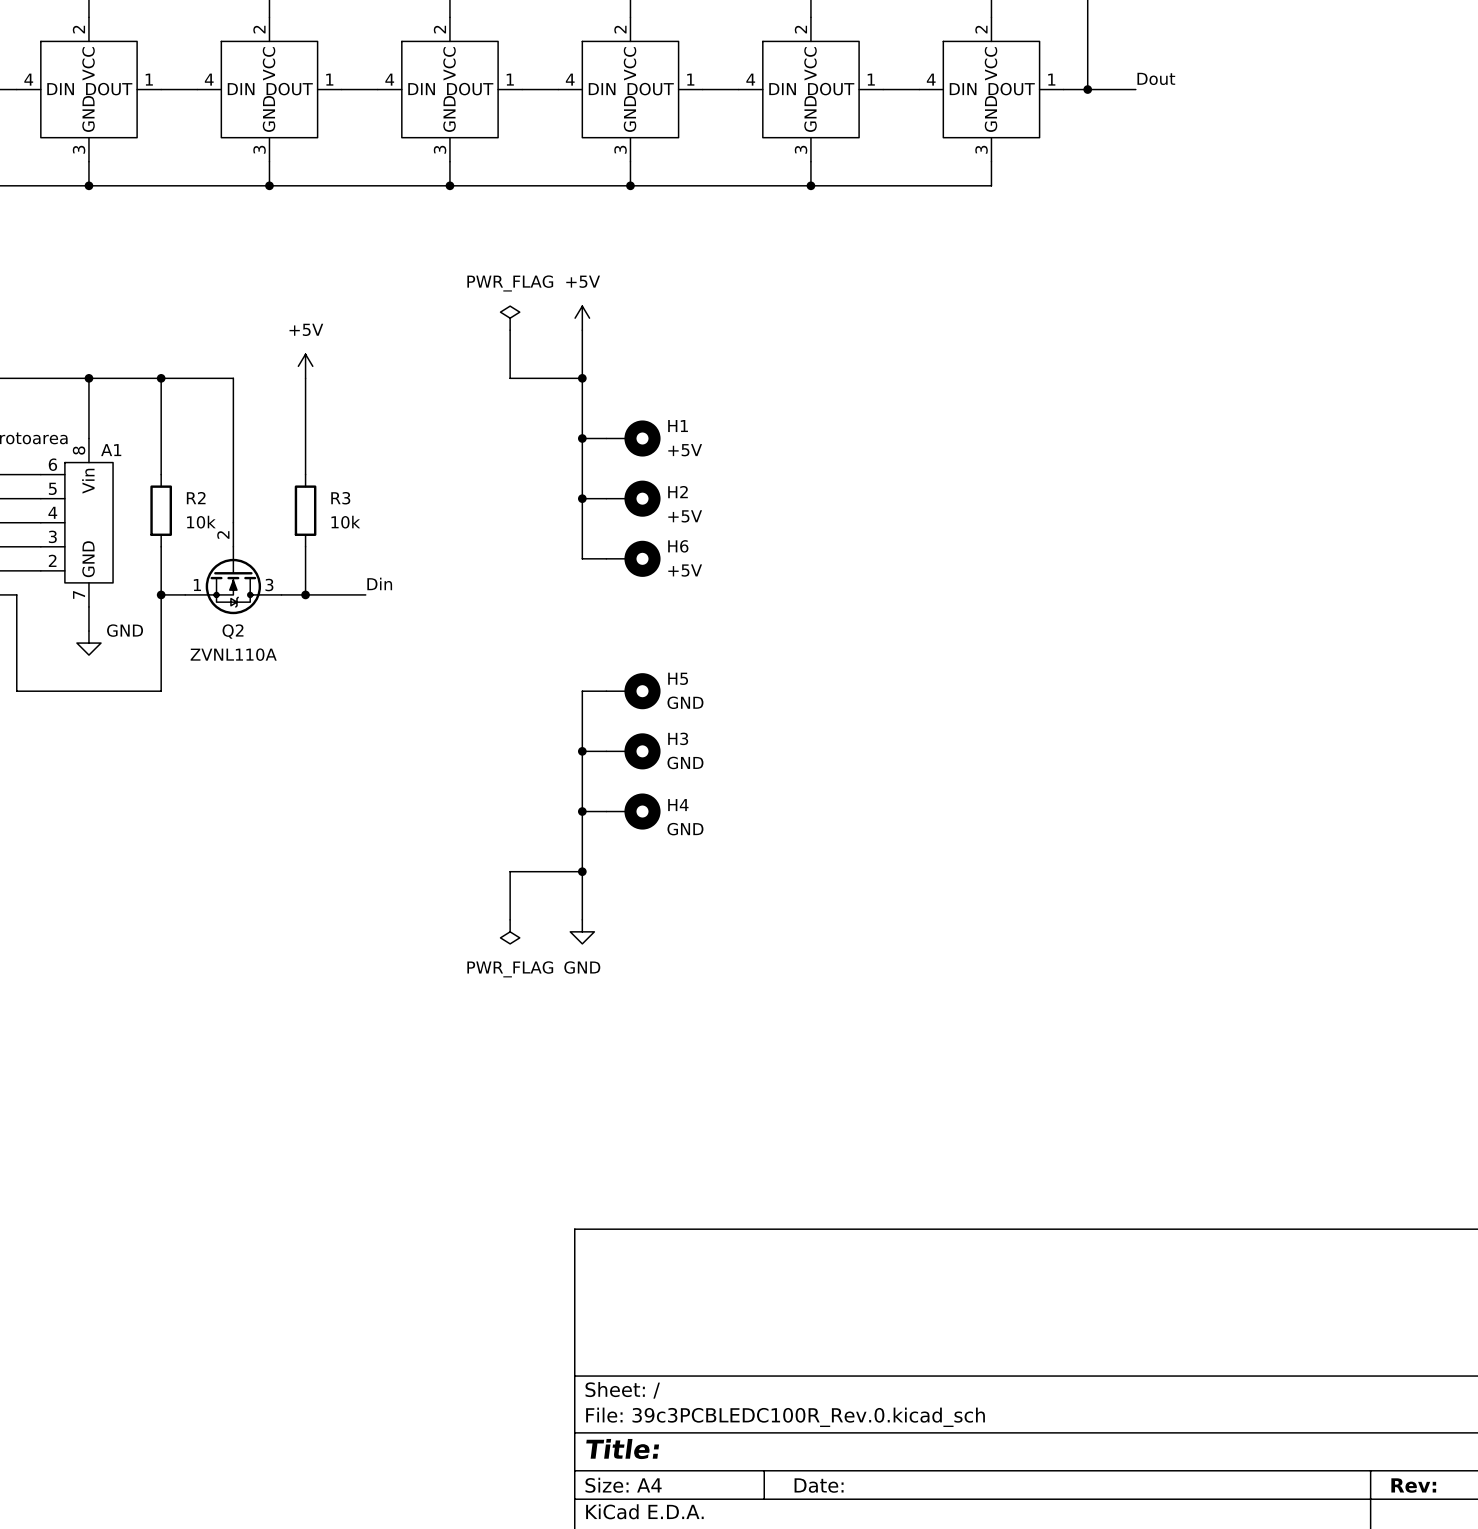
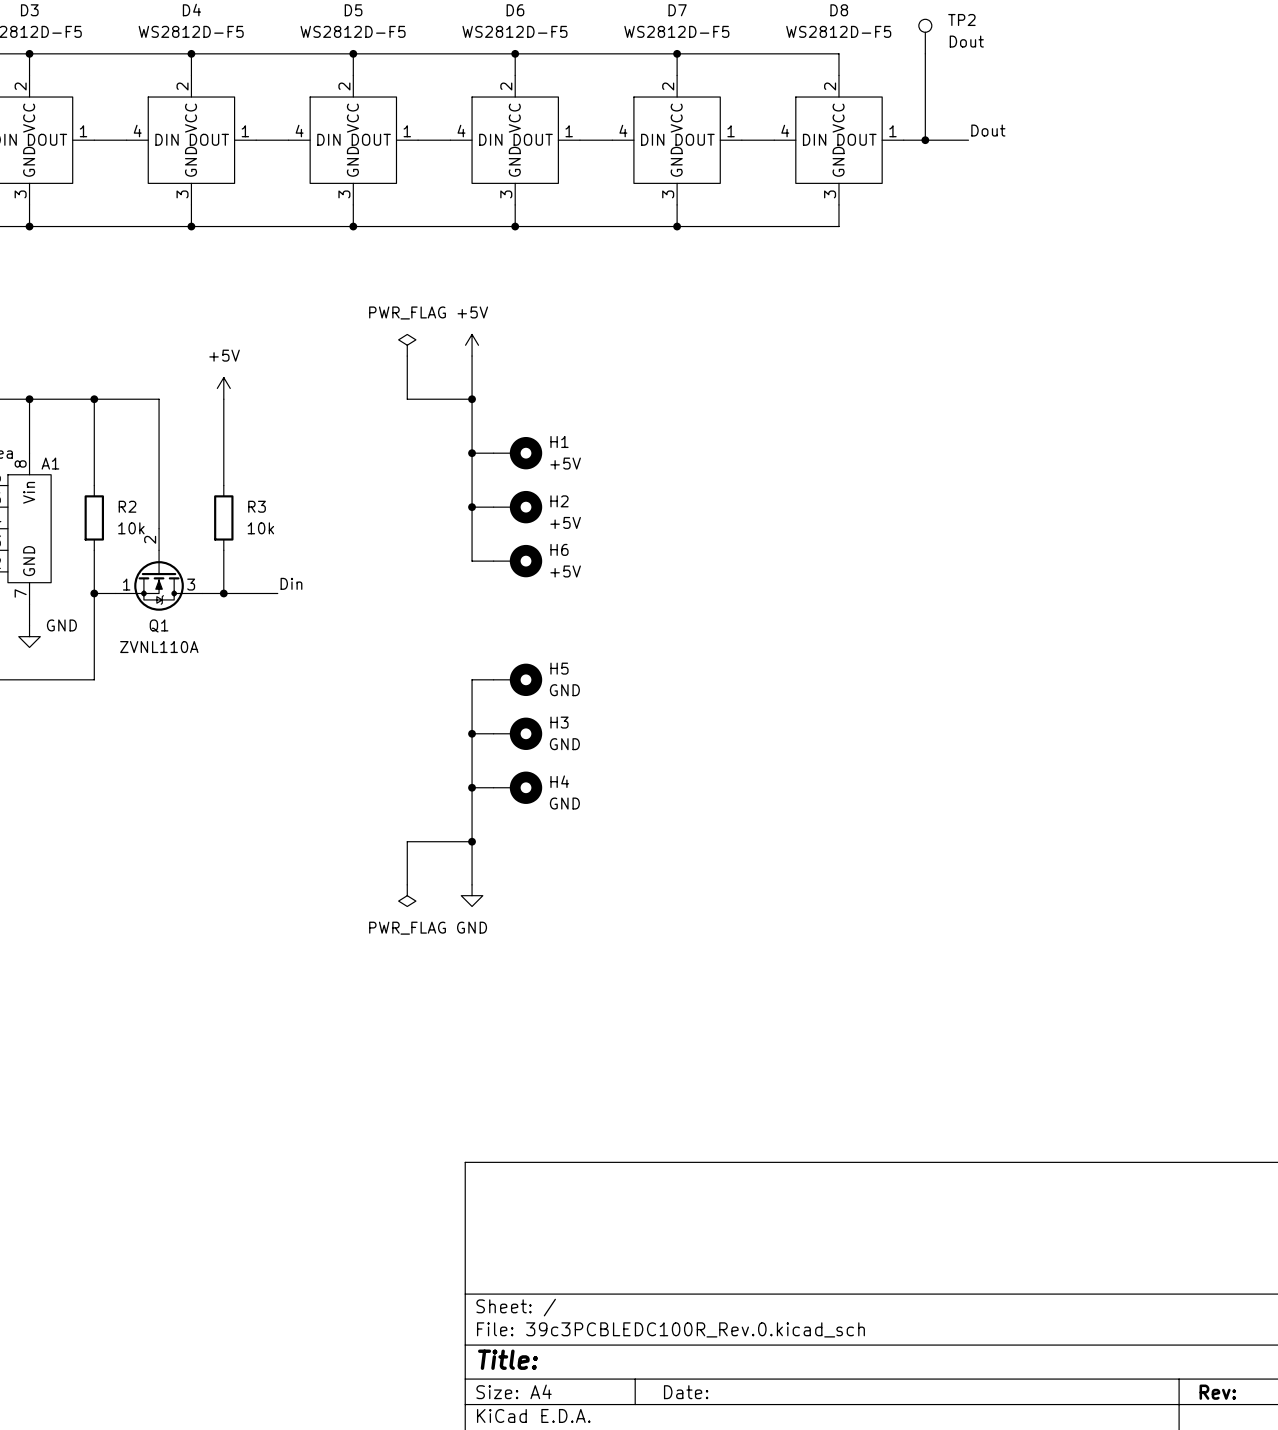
Q2 name: Q2 (233, 631) -> Q1 (159, 625)

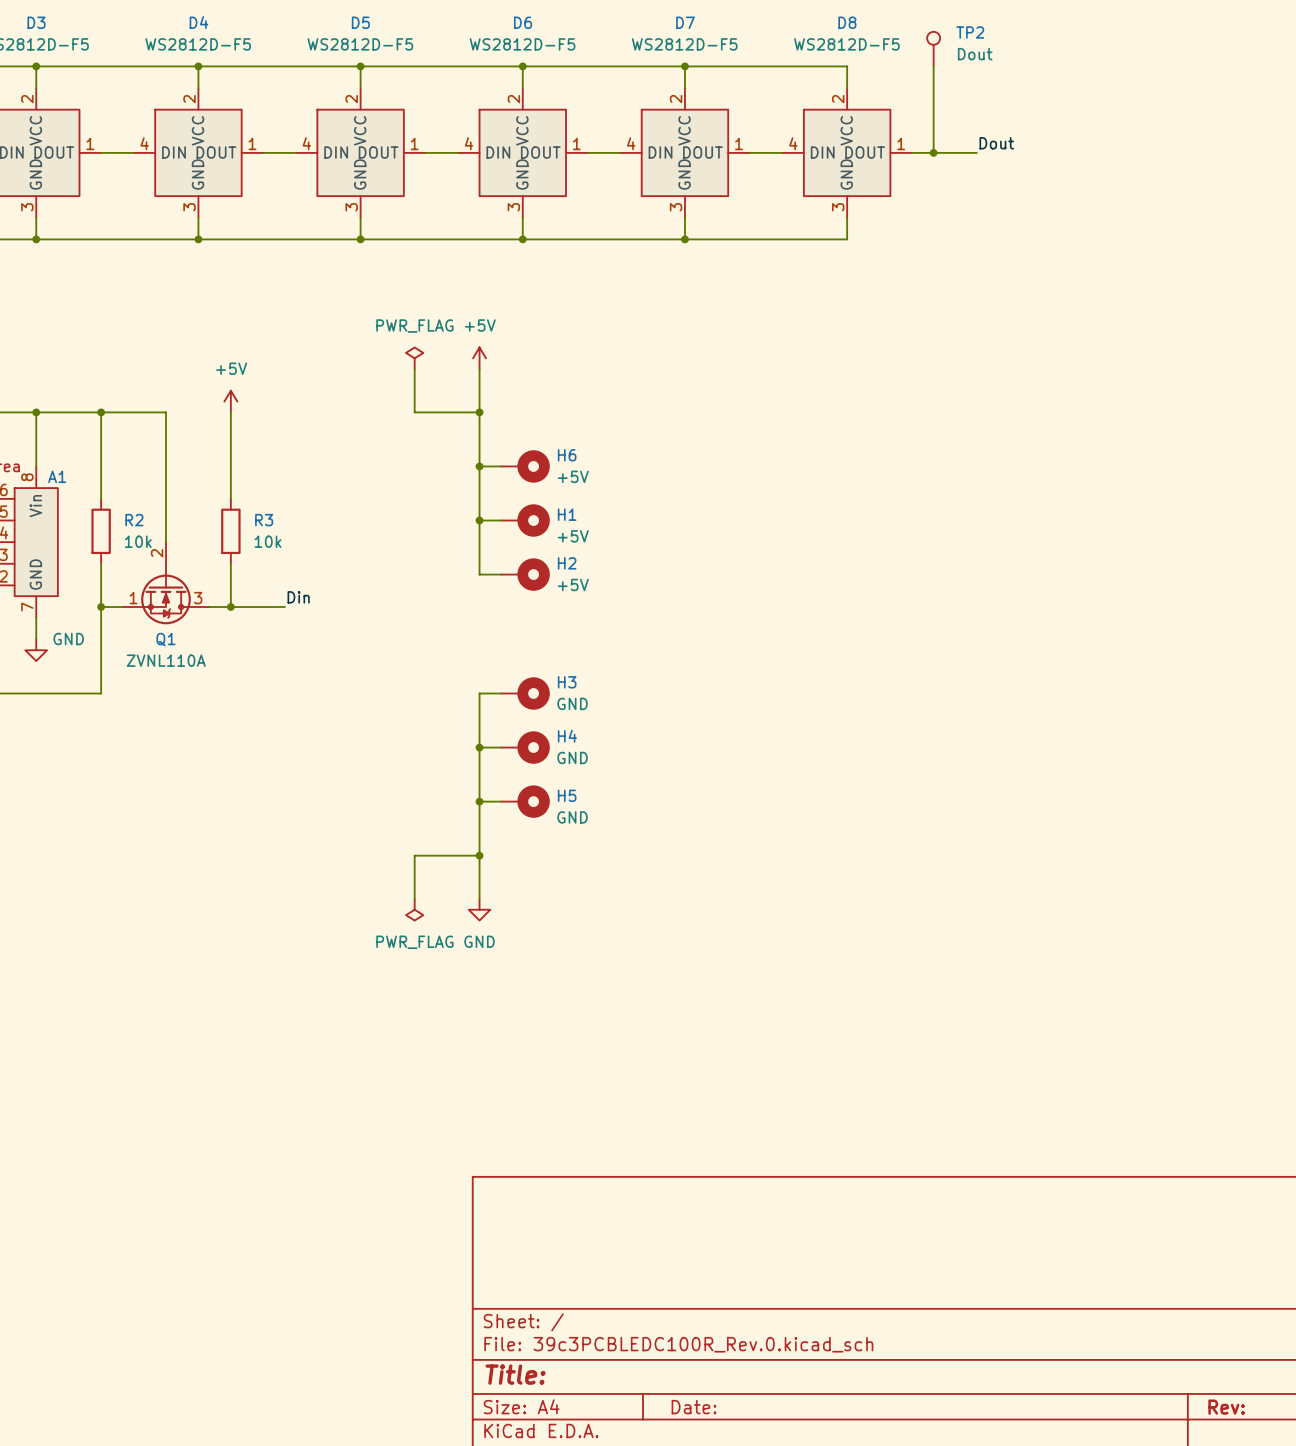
H1 name: H1 (559, 441) -> H6 (567, 455)
H2 name: H2 (559, 501) -> H1 (567, 514)
H6 name: H6 (559, 549) -> H2 (567, 563)
H5 name: H5 (559, 668) -> H3 (567, 682)
H3 name: H3 (559, 722) -> H4 (567, 736)
H4 name: H4 (559, 781) -> H5 (567, 795)

